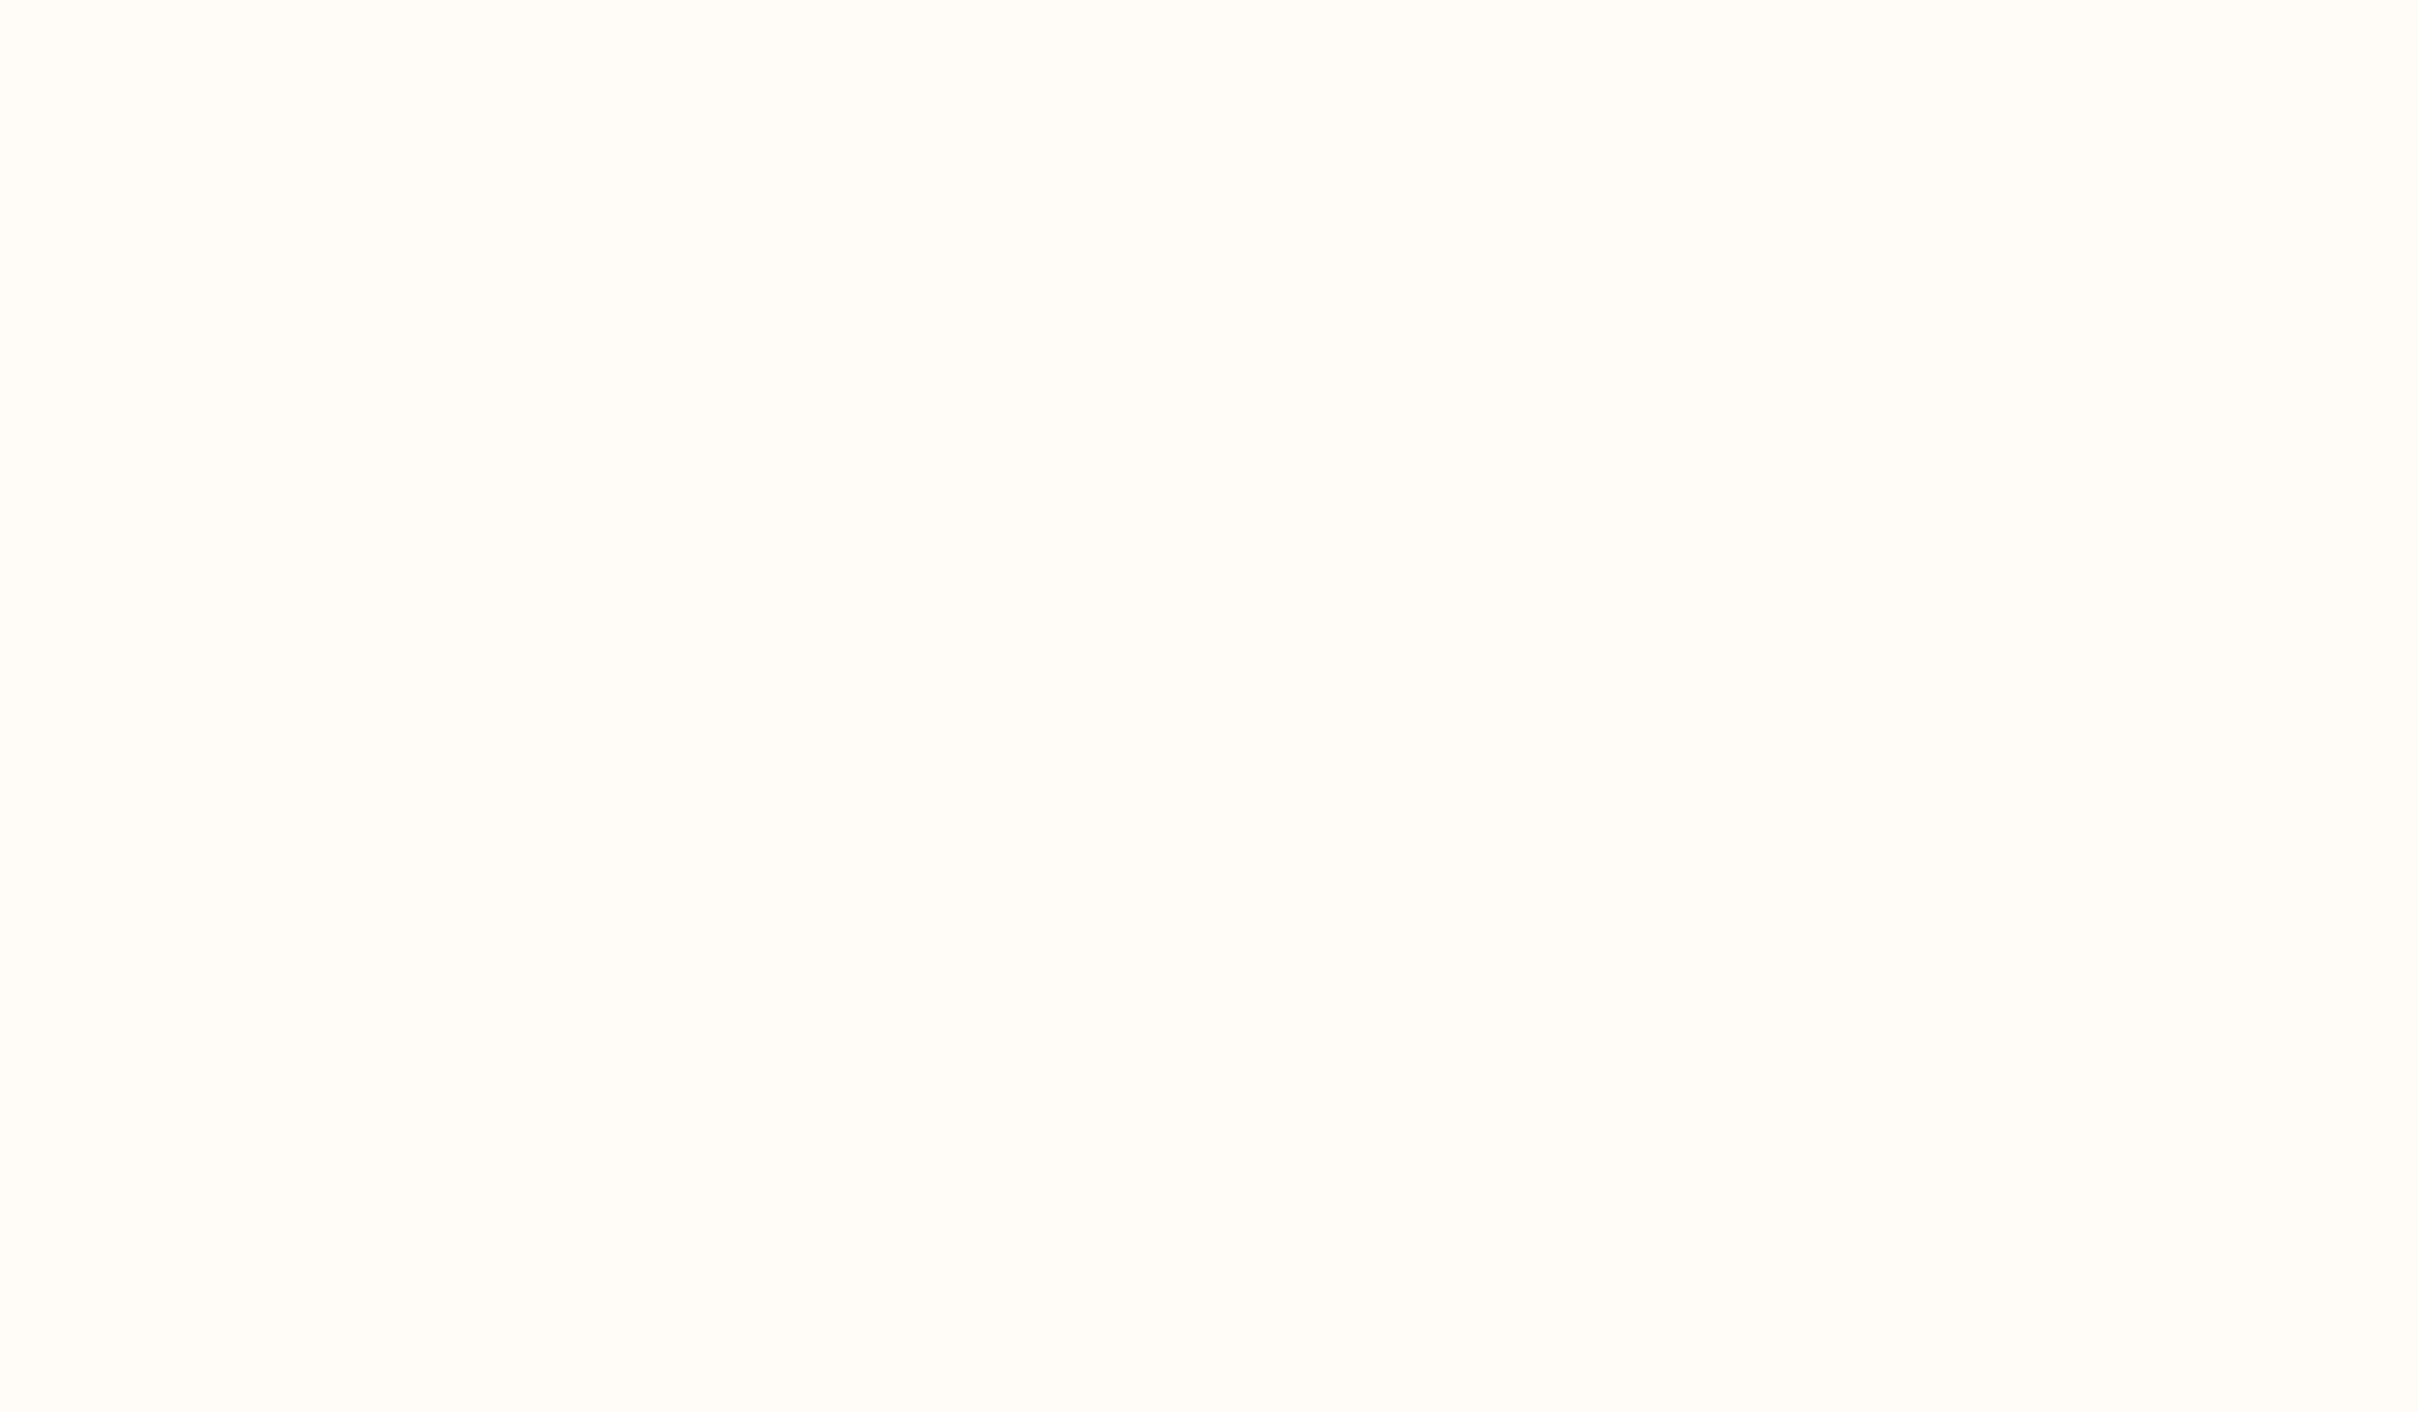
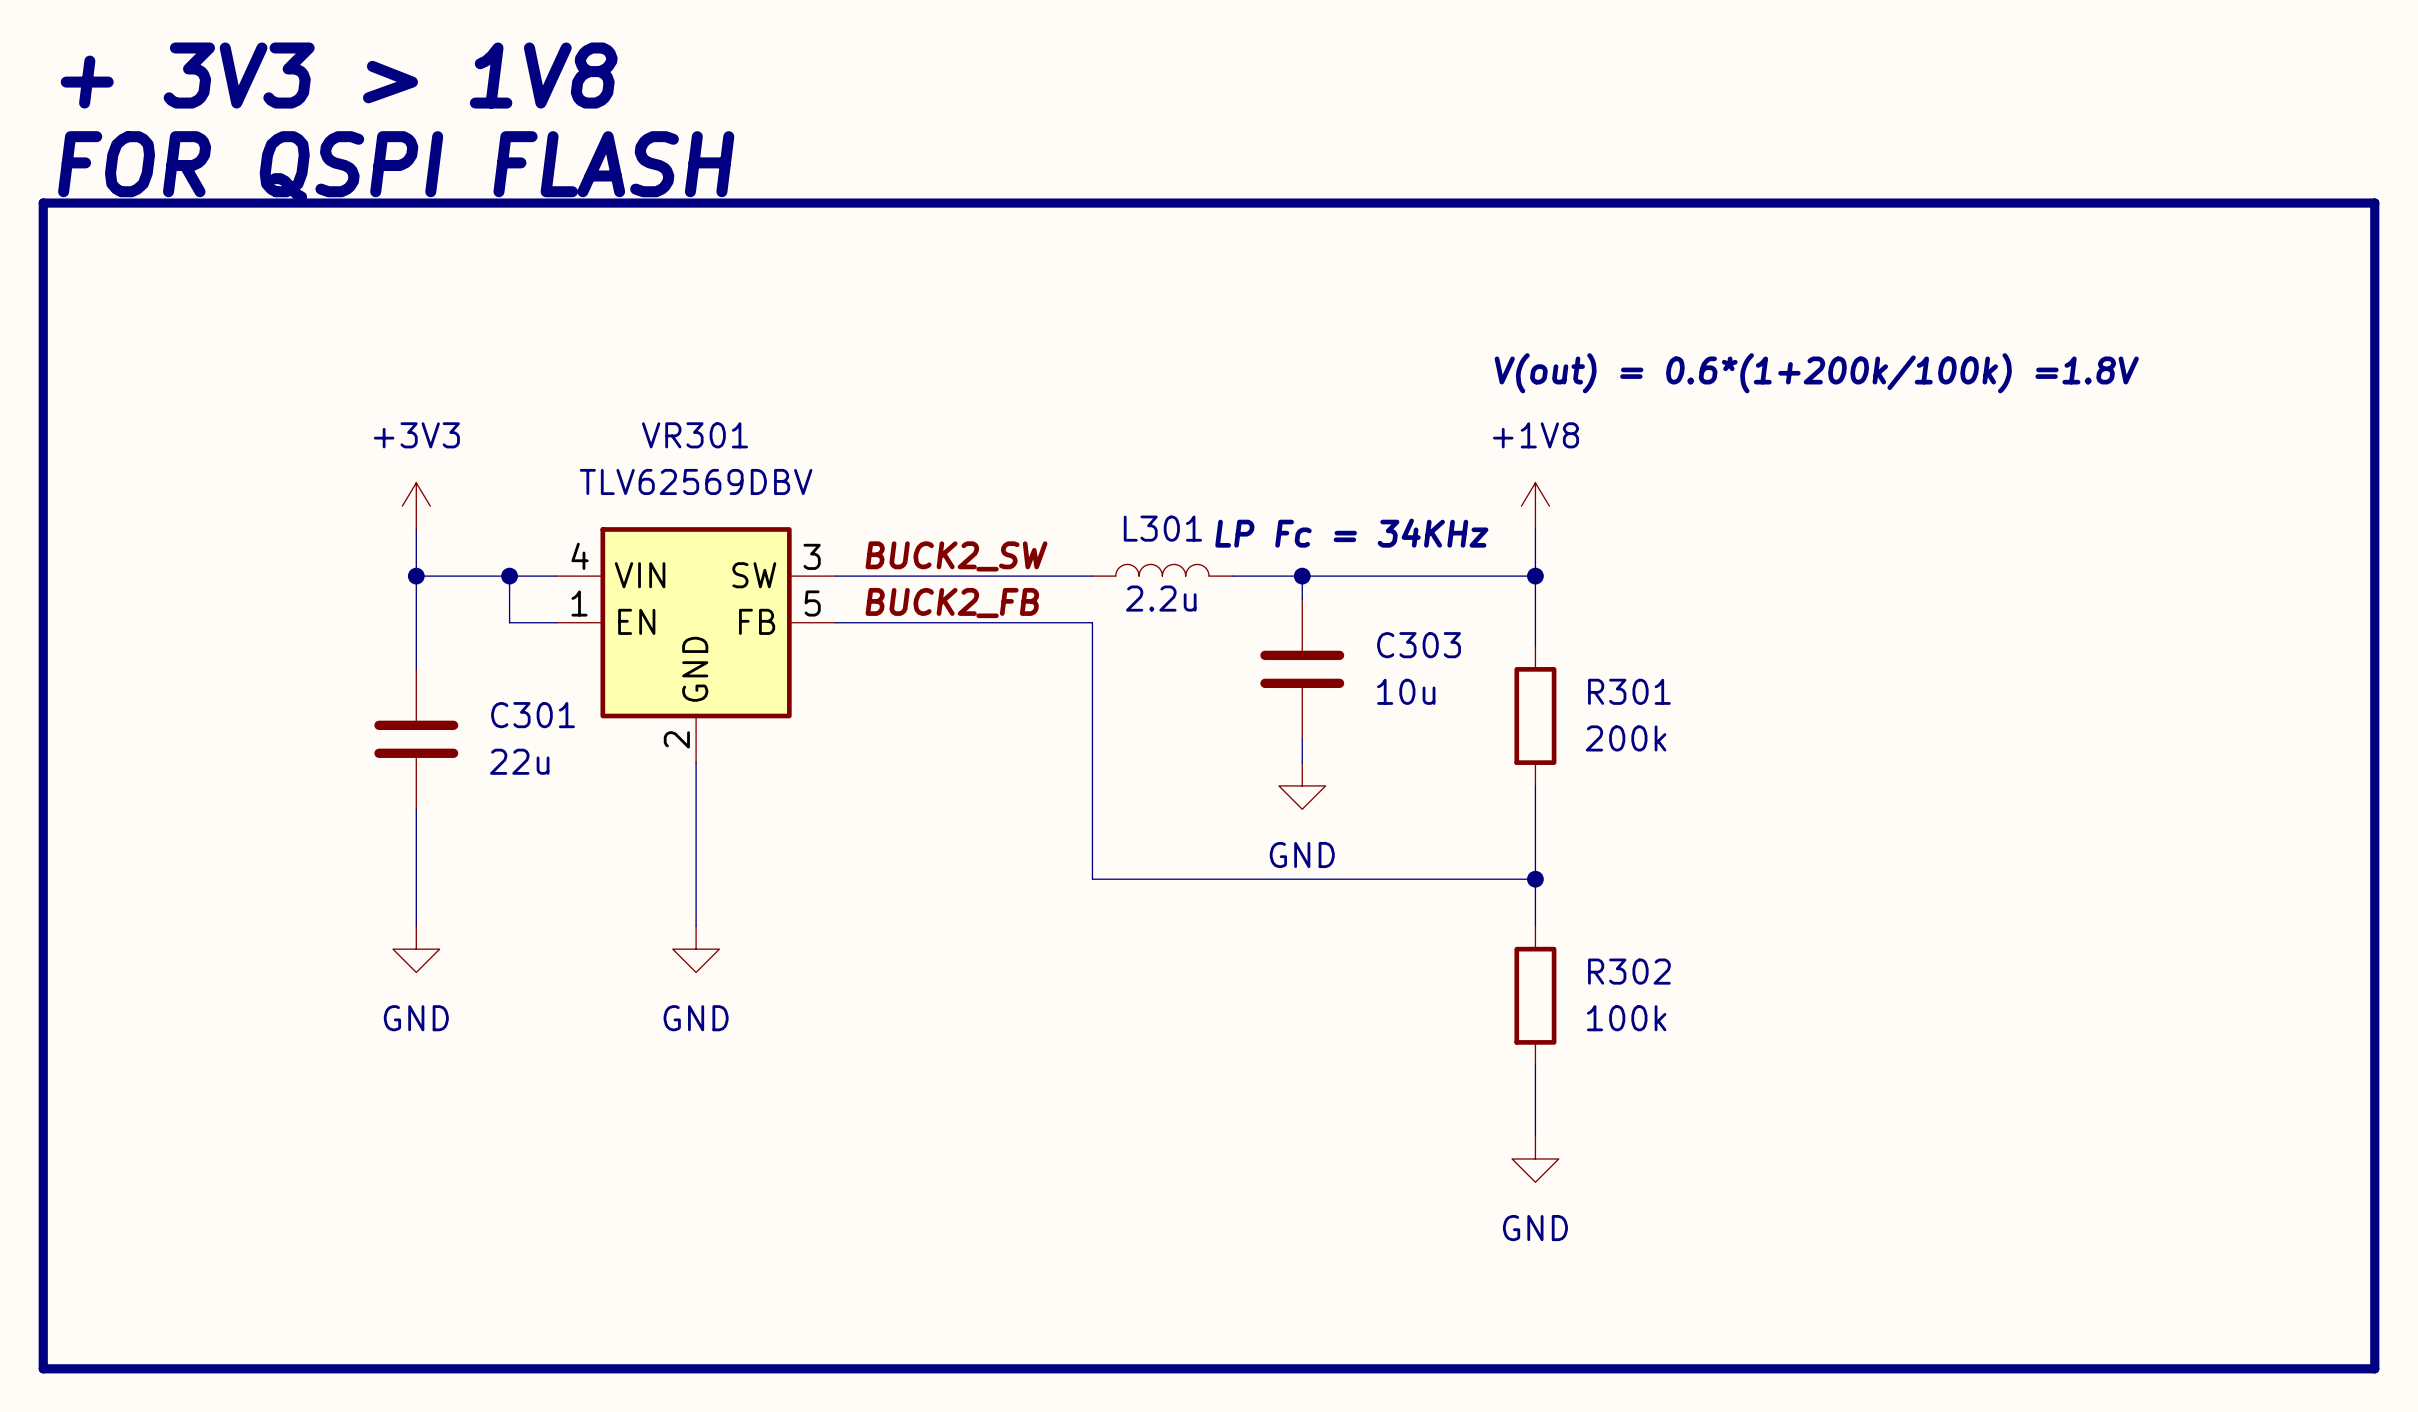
text: none -> + 3V3 > 1V8 (339, 75)
text: none -> FOR QSPI FLASH (396, 166)
line: none -> (43, 203) (43, 1368) (2374, 1368) (2374, 203) (43, 203)
text: none -> V(out) = 0.6*(1+200k/100k) =1.8V (1816, 373)
power symbol: none -> +3V3 (416, 506)
power symbol: none -> +1V8 (1535, 506)
wire: none -> (416, 529) (416, 669)
wire: none -> (1535, 529) (1535, 646)
text: none -> LP Fc = 34KHz (1351, 533)
label: none -> BUCK2_SW (956, 556)
L301: none -> 2.2u (1162, 570)
wire: none -> (416, 576) (556, 576)
junction: none -> (416, 576)
wire: none -> (509, 576) (509, 622) (556, 622)
junction: none -> (509, 576)
wire: none -> (835, 576) (1092, 576)
wire: none -> (1232, 576) (1535, 576)
wire: none -> (1302, 576) (1302, 599)
junction: none -> (1302, 576)
junction: none -> (1535, 576)
label: none -> BUCK2_FB (952, 603)
wire: none -> (835, 622) (1092, 622) (1092, 879) (1535, 879)
VR301: none -> TLV62569DBV (696, 644)
C303: none -> 10u (1302, 669)
R301: none -> 200k (1535, 715)
C301: none -> 22u (416, 739)
wire: none -> (1302, 739) (1302, 762)
wire: none -> (696, 762) (696, 925)
power symbol: none -> GND (1302, 785)
wire: none -> (1535, 785) (1535, 925)
wire: none -> (416, 809) (416, 925)
junction: none -> (1535, 879)
power symbol: none -> GND (416, 949)
power symbol: none -> GND (696, 949)
R302: none -> 100k (1535, 995)
wire: none -> (1535, 1065) (1535, 1135)
power symbol: none -> GND (1535, 1158)

